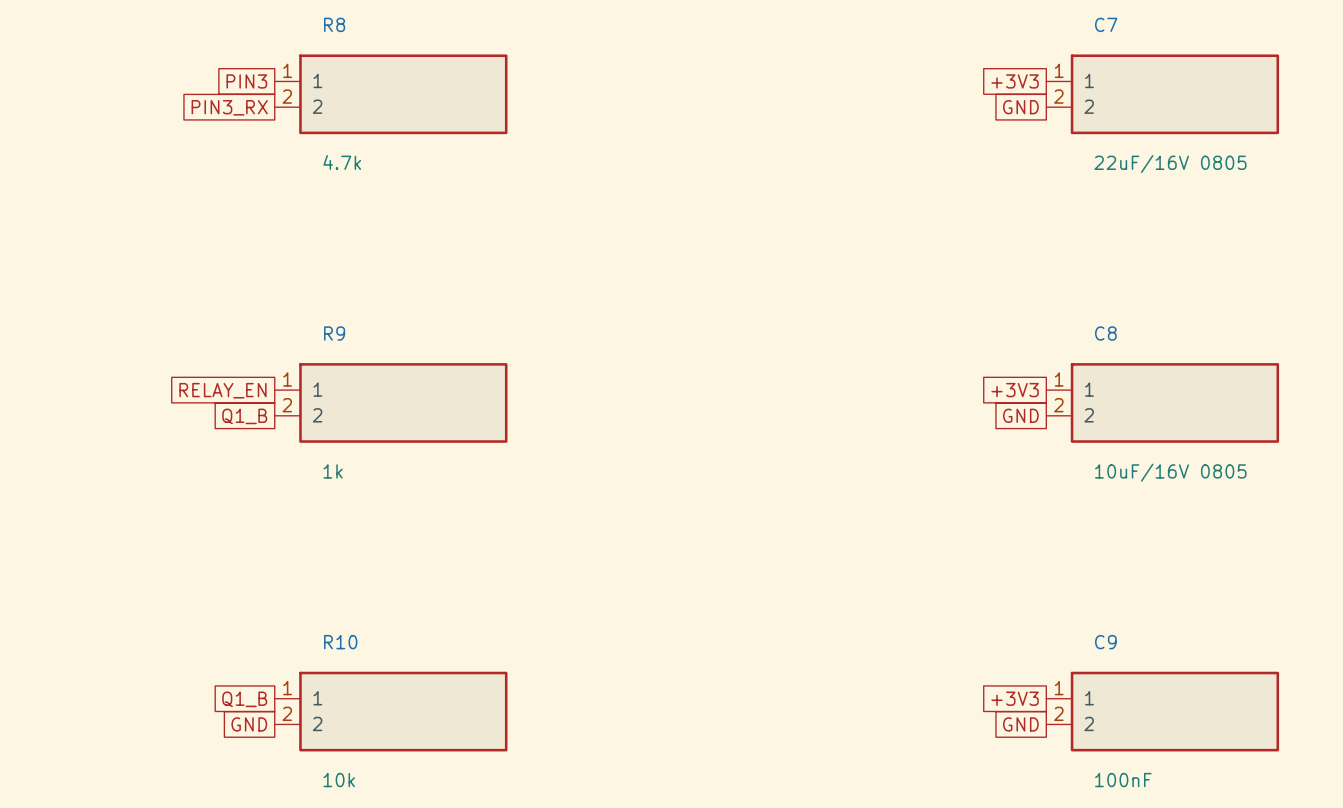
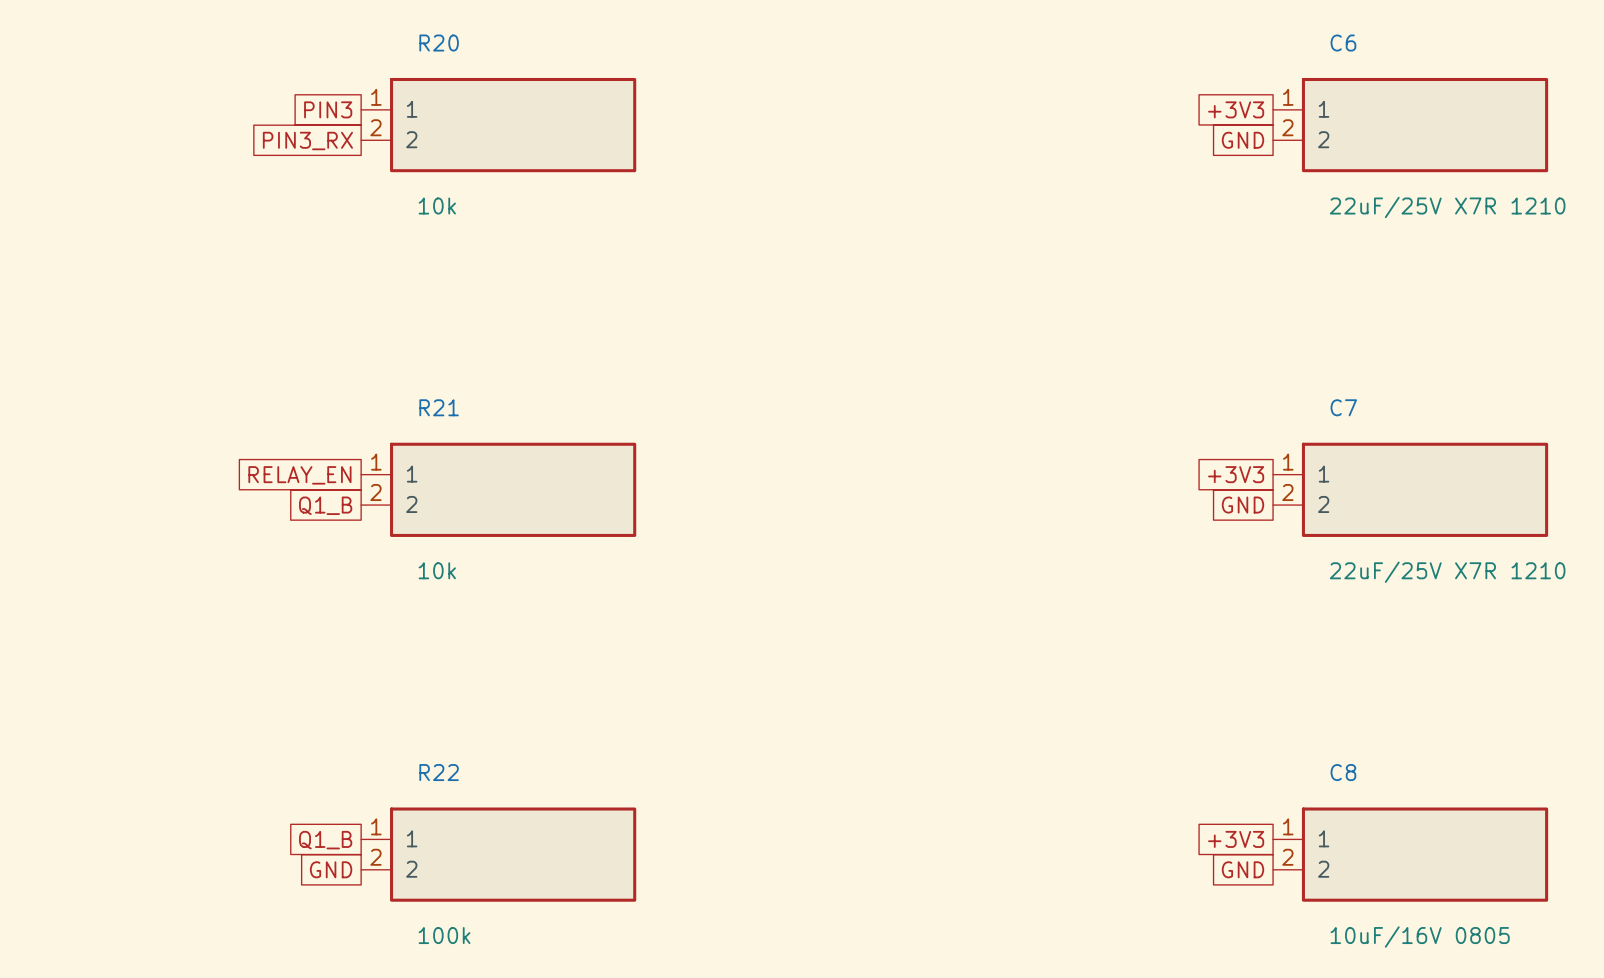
R8 name: R8 (334, 24) -> R20 (439, 43)
C7 name: C7 (1106, 24) -> C6 (1343, 43)
R8 value: 4.7k (342, 162) -> 10k (437, 206)
C7 value: 22uF/16V 0805 (1170, 164) -> 22uF/25V X7R 1210 (1447, 207)
R9 name: R9 (334, 333) -> R21 (439, 407)
C8 name: C8 (1105, 333) -> C7 (1343, 407)
R9 value: 1k (333, 471) -> 10k (437, 570)
C8 value: 10uF/16V 0805 (1170, 472) -> 22uF/25V X7R 1210 (1447, 572)
R10 name: R10 (340, 642) -> R22 (439, 772)
C9 name: C9 (1105, 642) -> C8 (1343, 772)
R10 value: 10k (339, 780) -> 100k (444, 935)
C9 value: 100nF (1123, 780) -> 10uF/16V 0805 (1420, 936)

